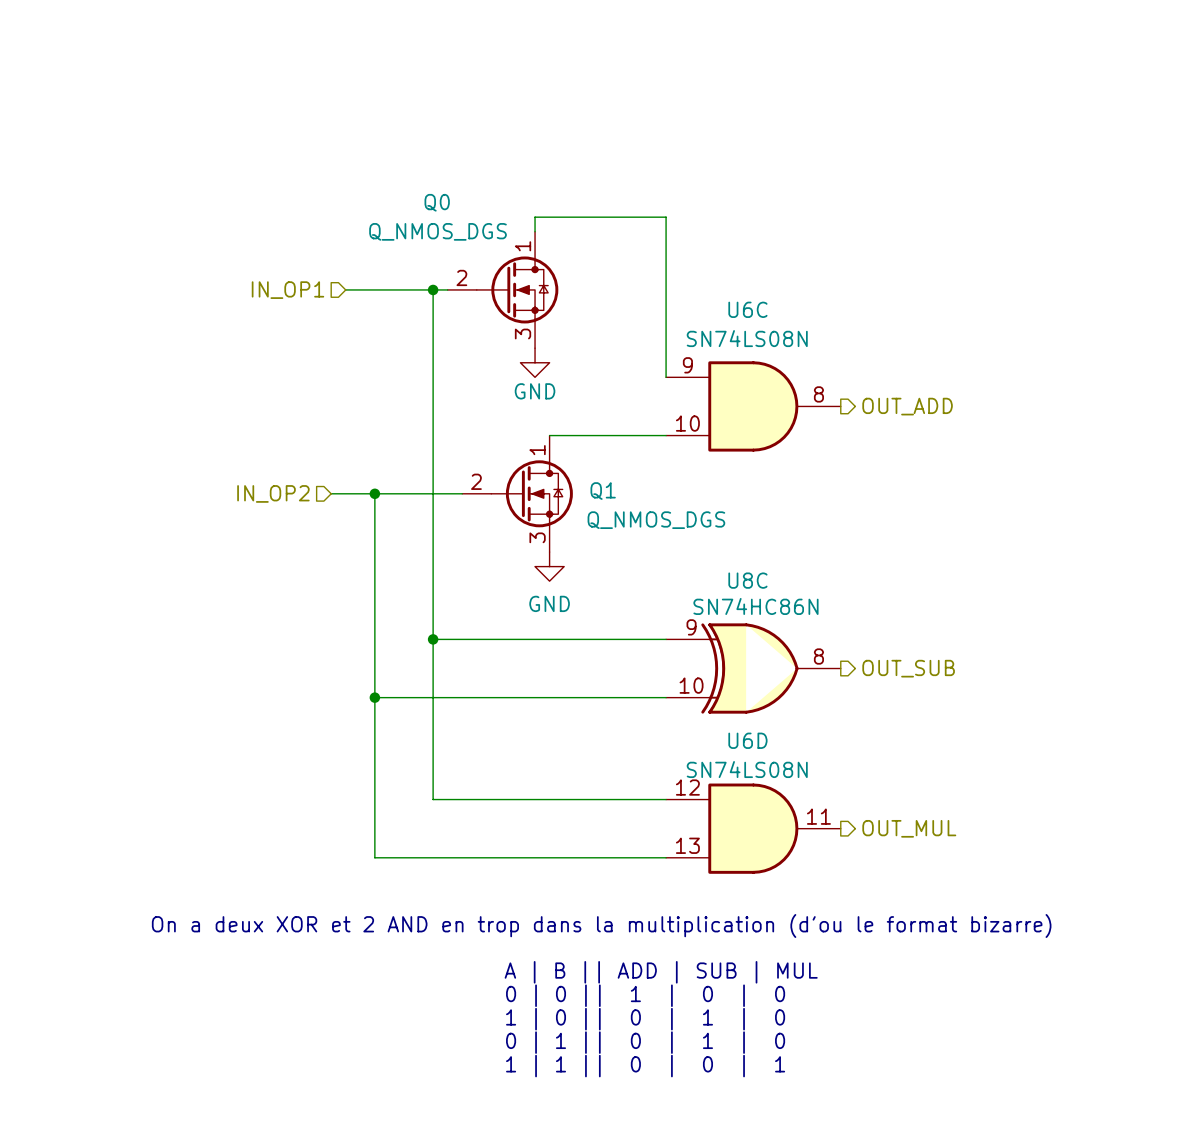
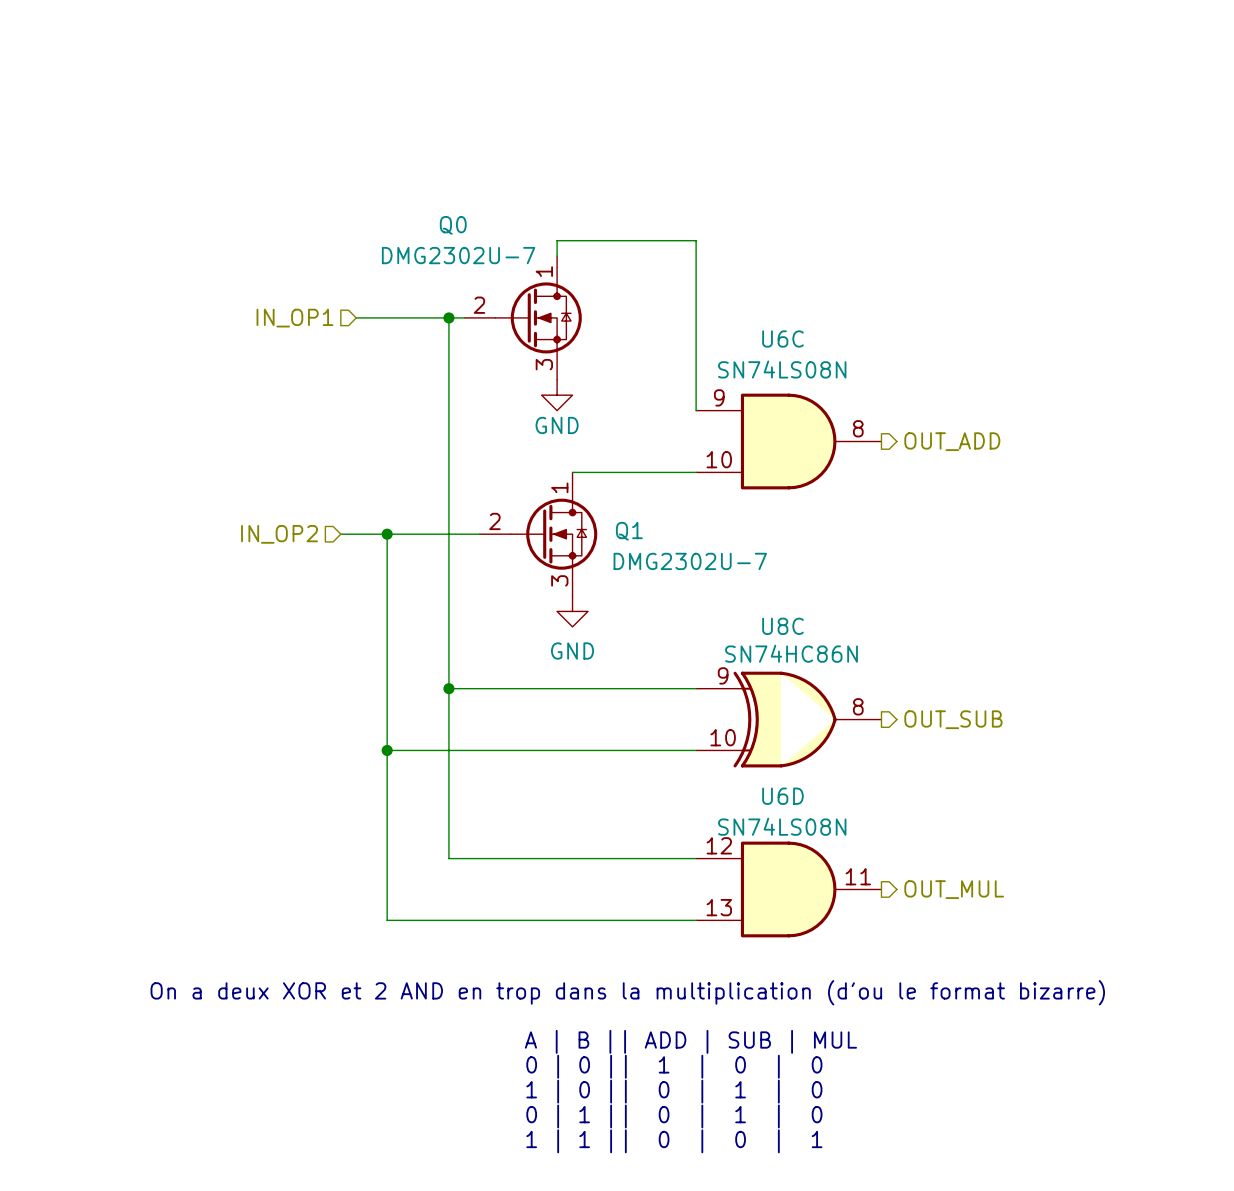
Q0 value: Q_NMOS_DGS (438, 231) -> DMG2302U-7 (458, 255)
Q1 value: Q_NMOS_DGS (656, 520) -> DMG2302U-7 (690, 561)

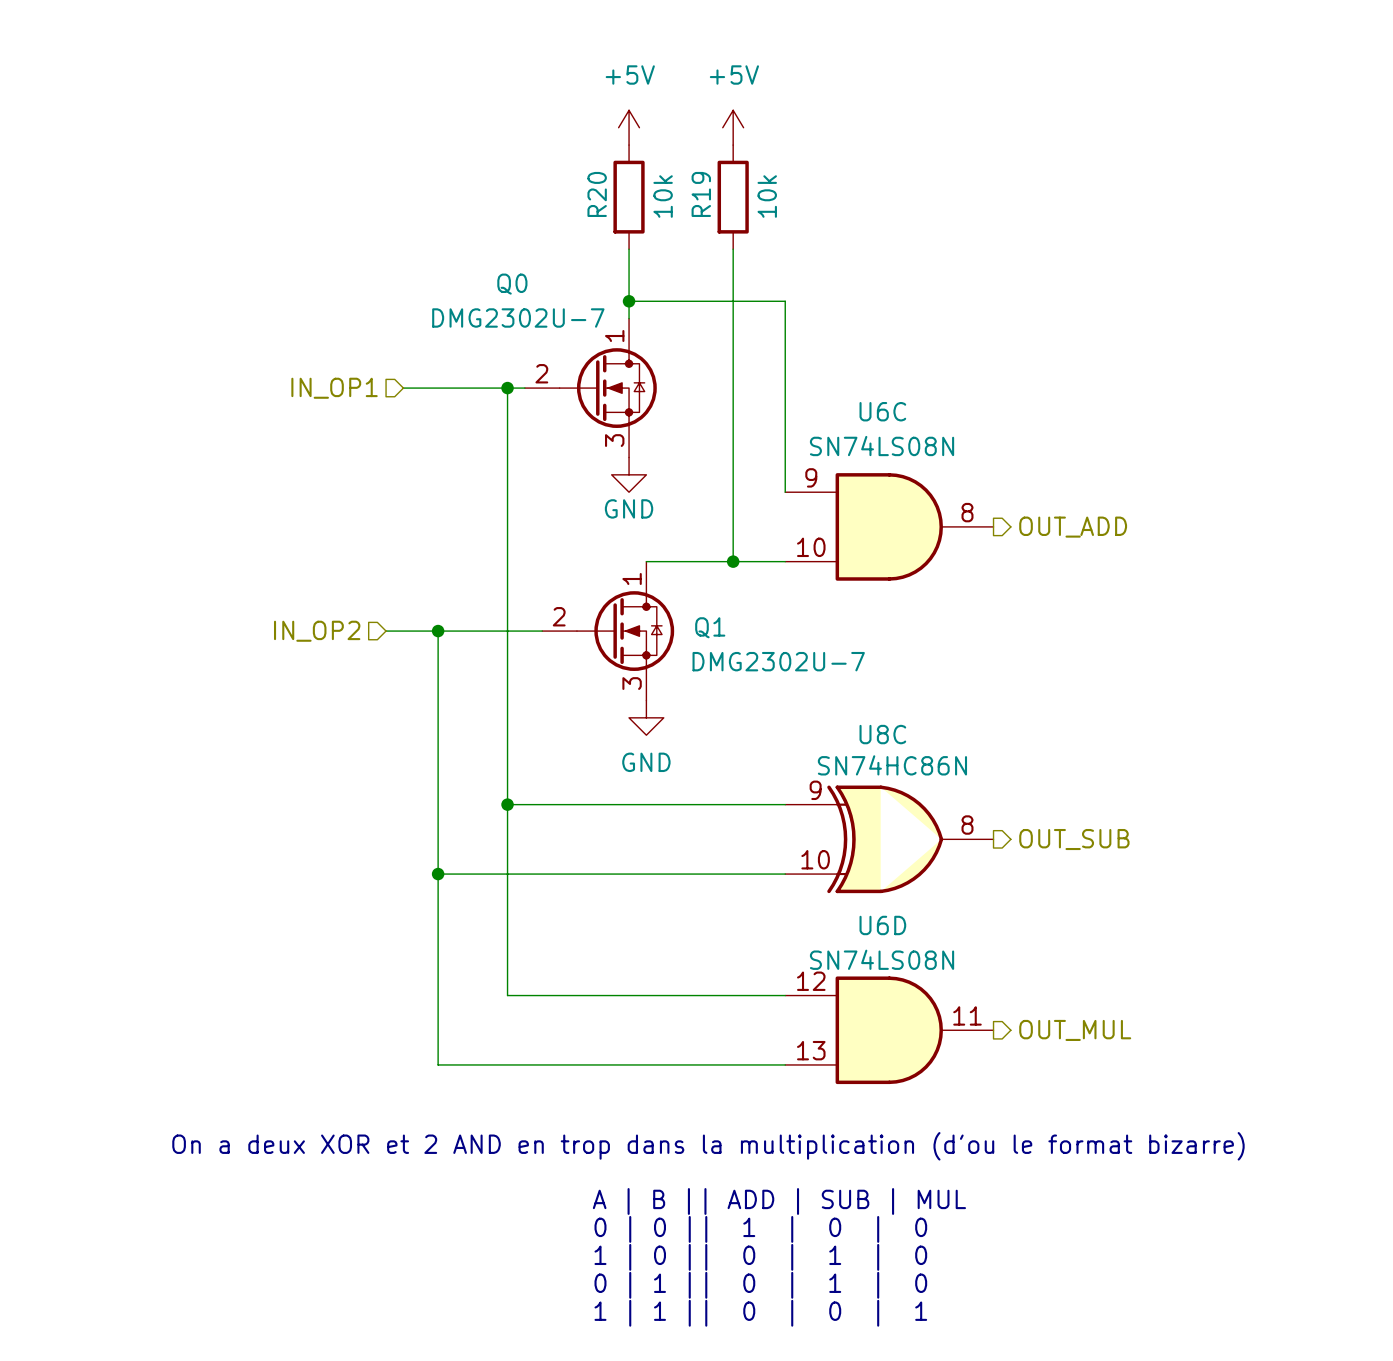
power symbol: none -> +5V (629, 127)
power symbol: none -> +5V (733, 127)
R20: none -> 10k (629, 197)
R19: none -> 10k (733, 197)
wire: none -> (629, 249) (629, 301)
wire: none -> (733, 249) (733, 561)
junction: none -> (629, 301)
junction: none -> (733, 561)

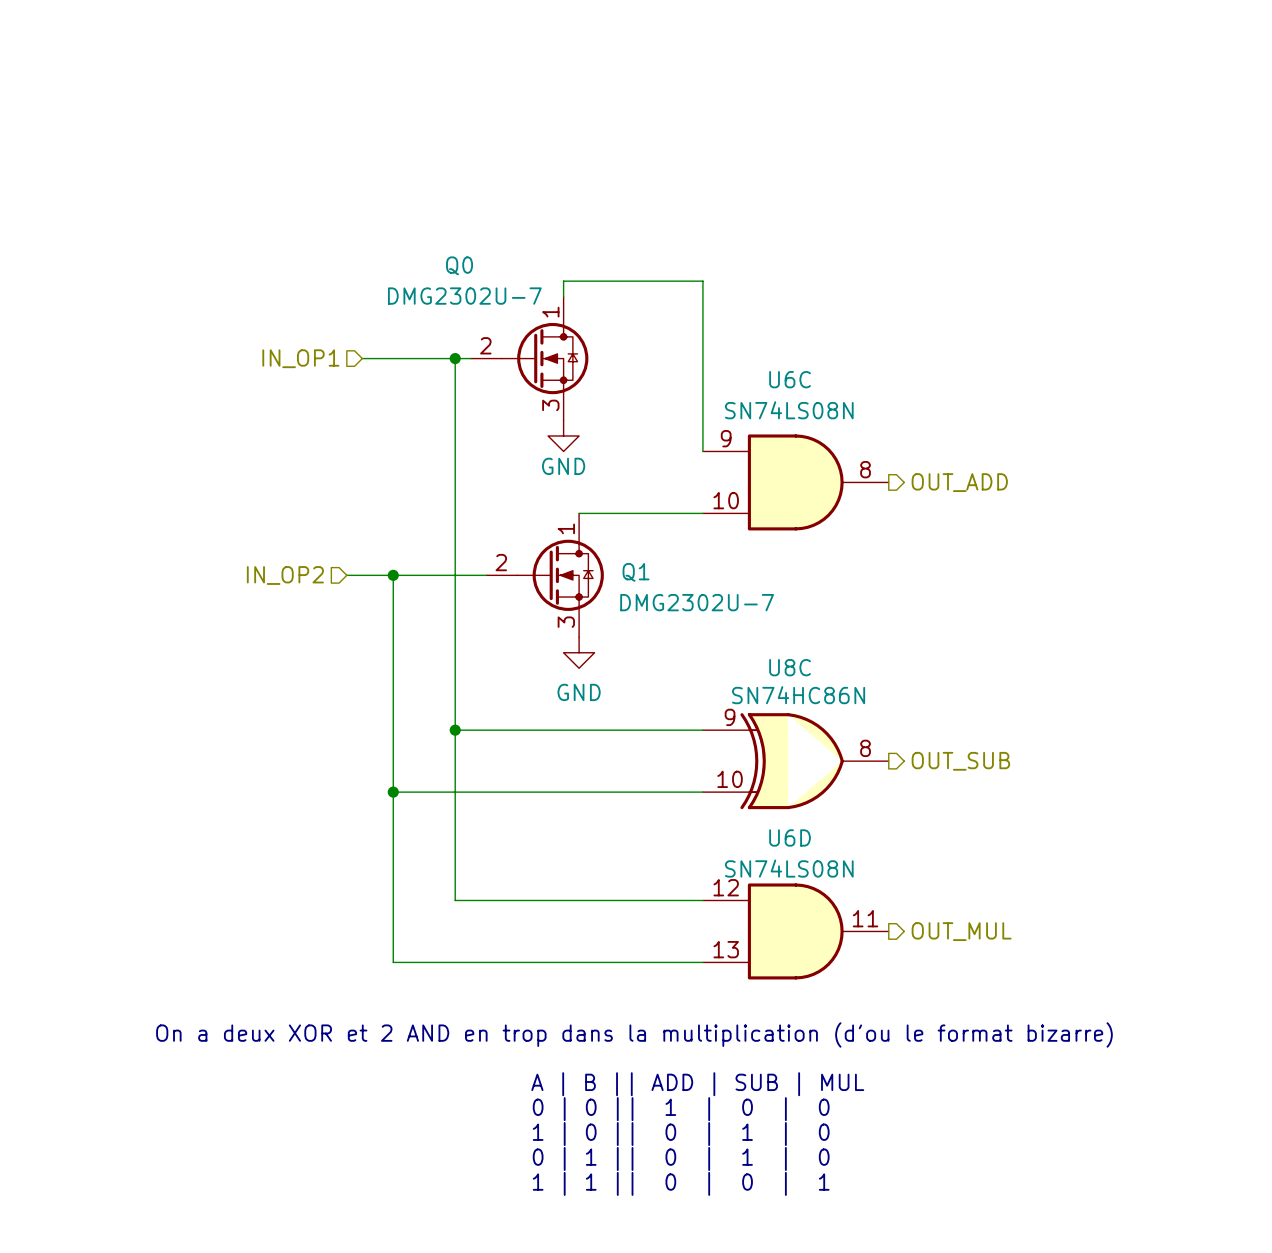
power symbol: +5V (629, 127) -> none
power symbol: +5V (733, 127) -> none
R20: 10k (629, 197) -> none
R19: 10k (733, 197) -> none
wire: (629, 249) (629, 301) -> none
wire: (733, 249) (733, 561) -> none
junction: (629, 301) -> none
junction: (733, 561) -> none

